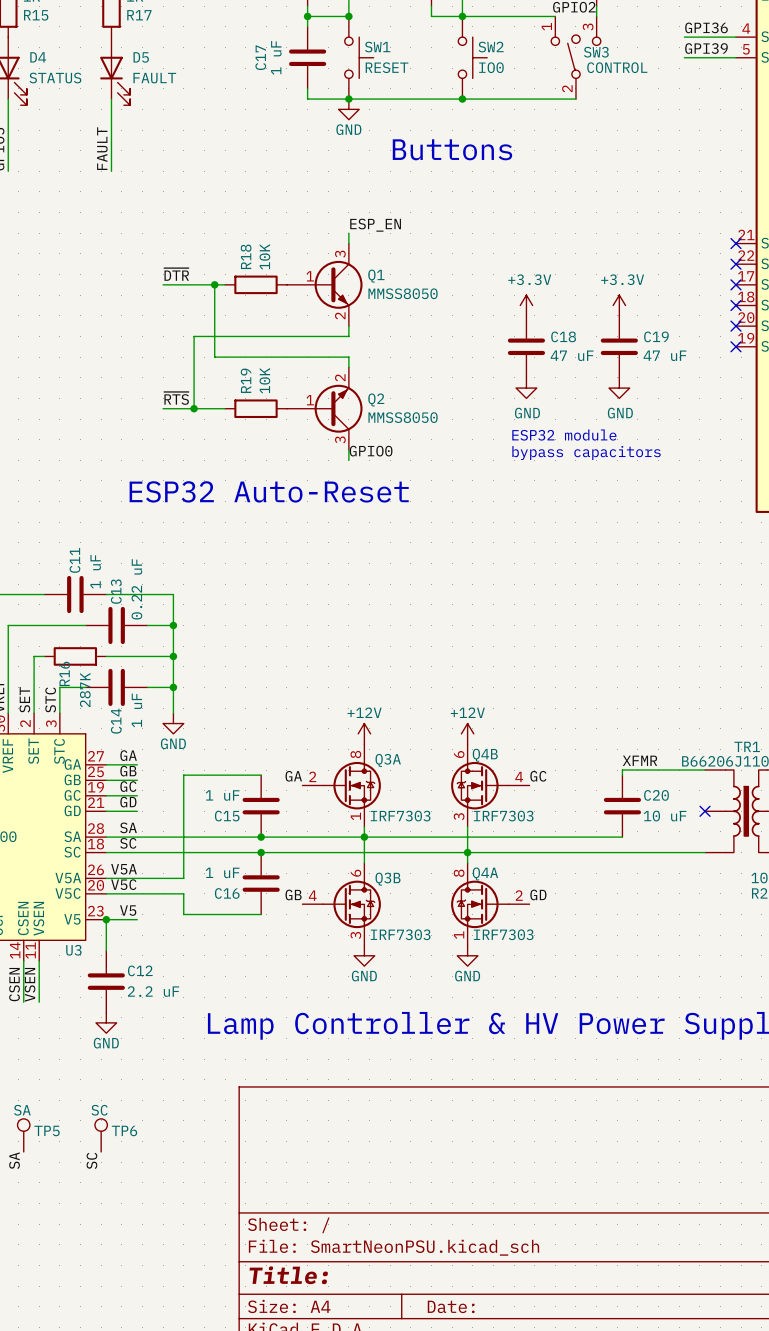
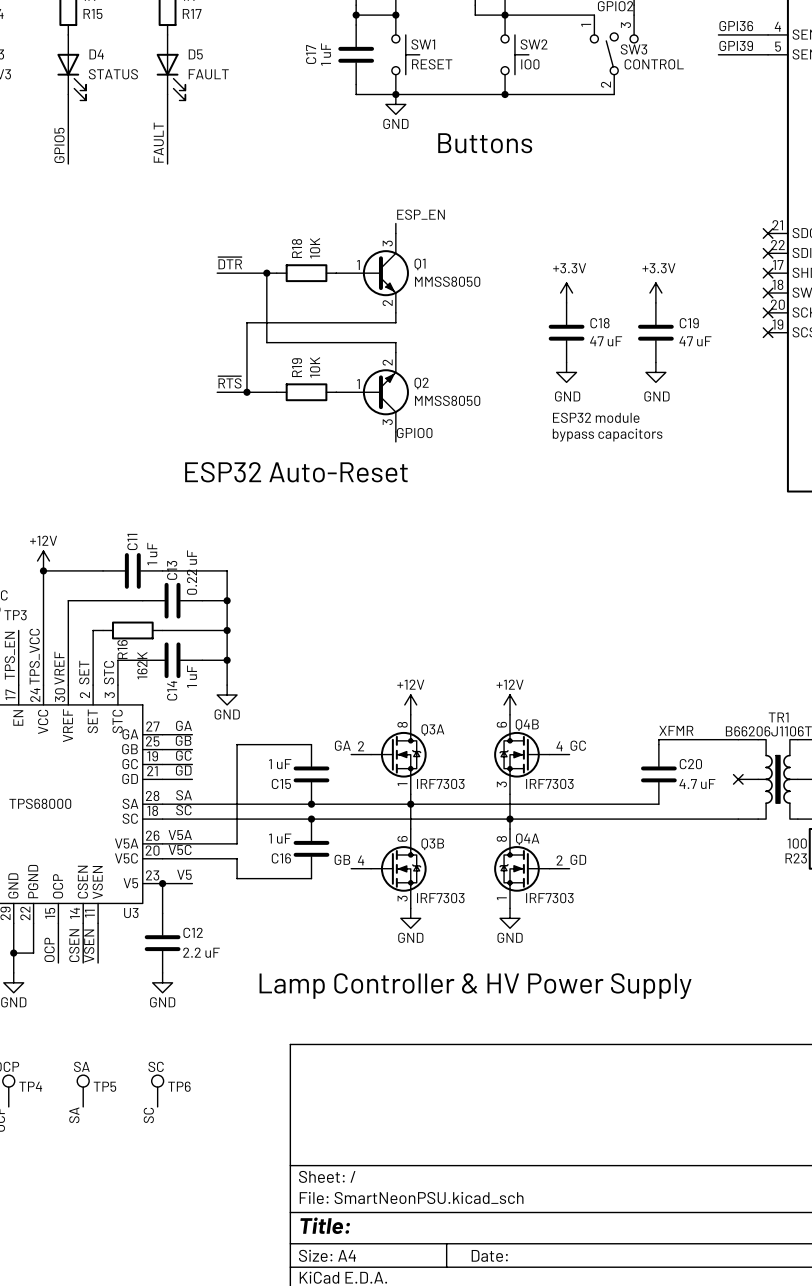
R16 value: 287K (85, 690) -> 162K (142, 665)
C20 value: 10 uF (665, 816) -> 4.7 uF (697, 784)

